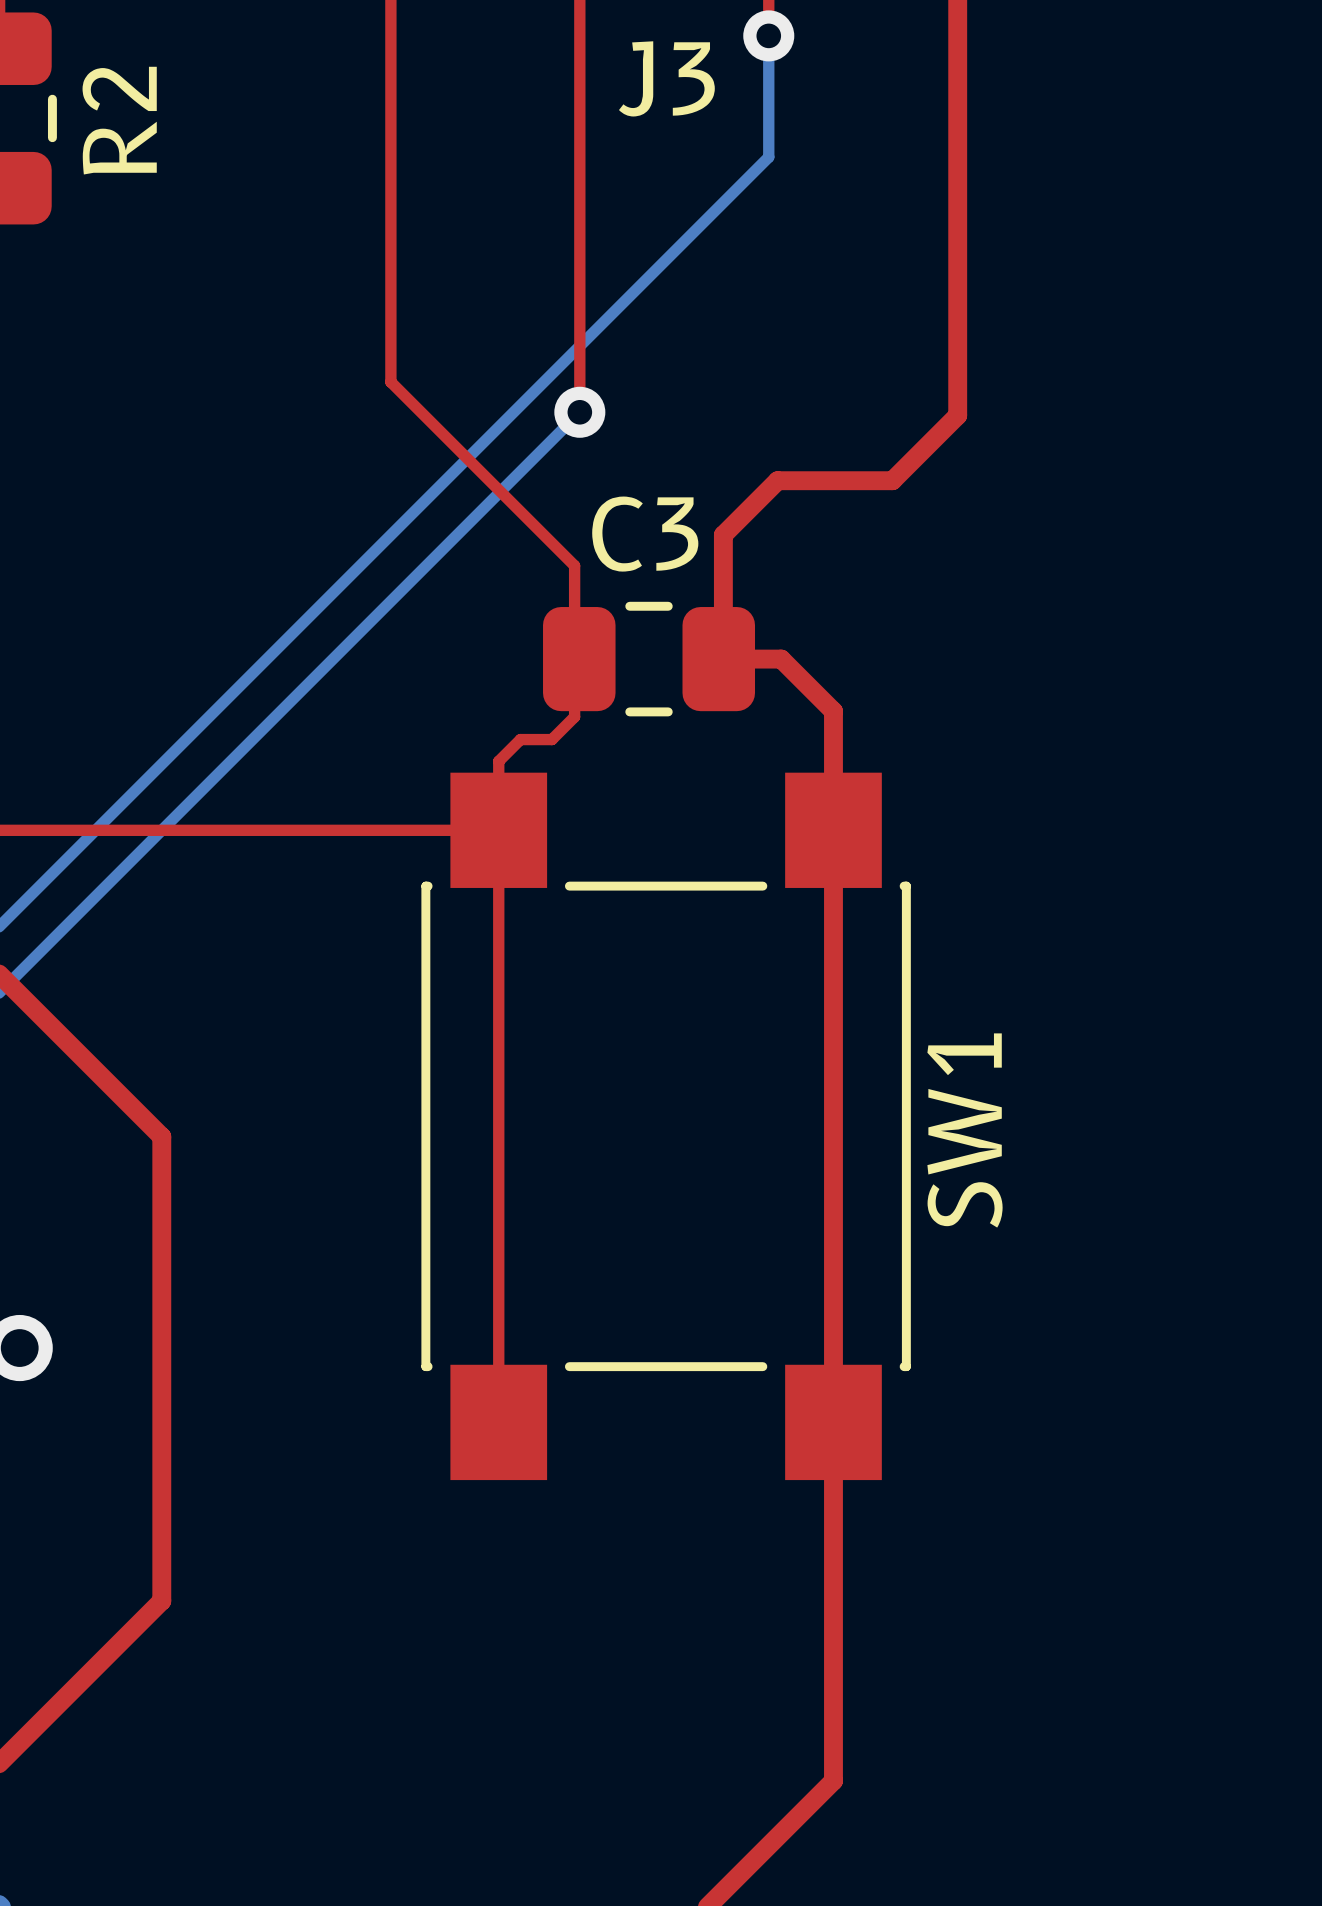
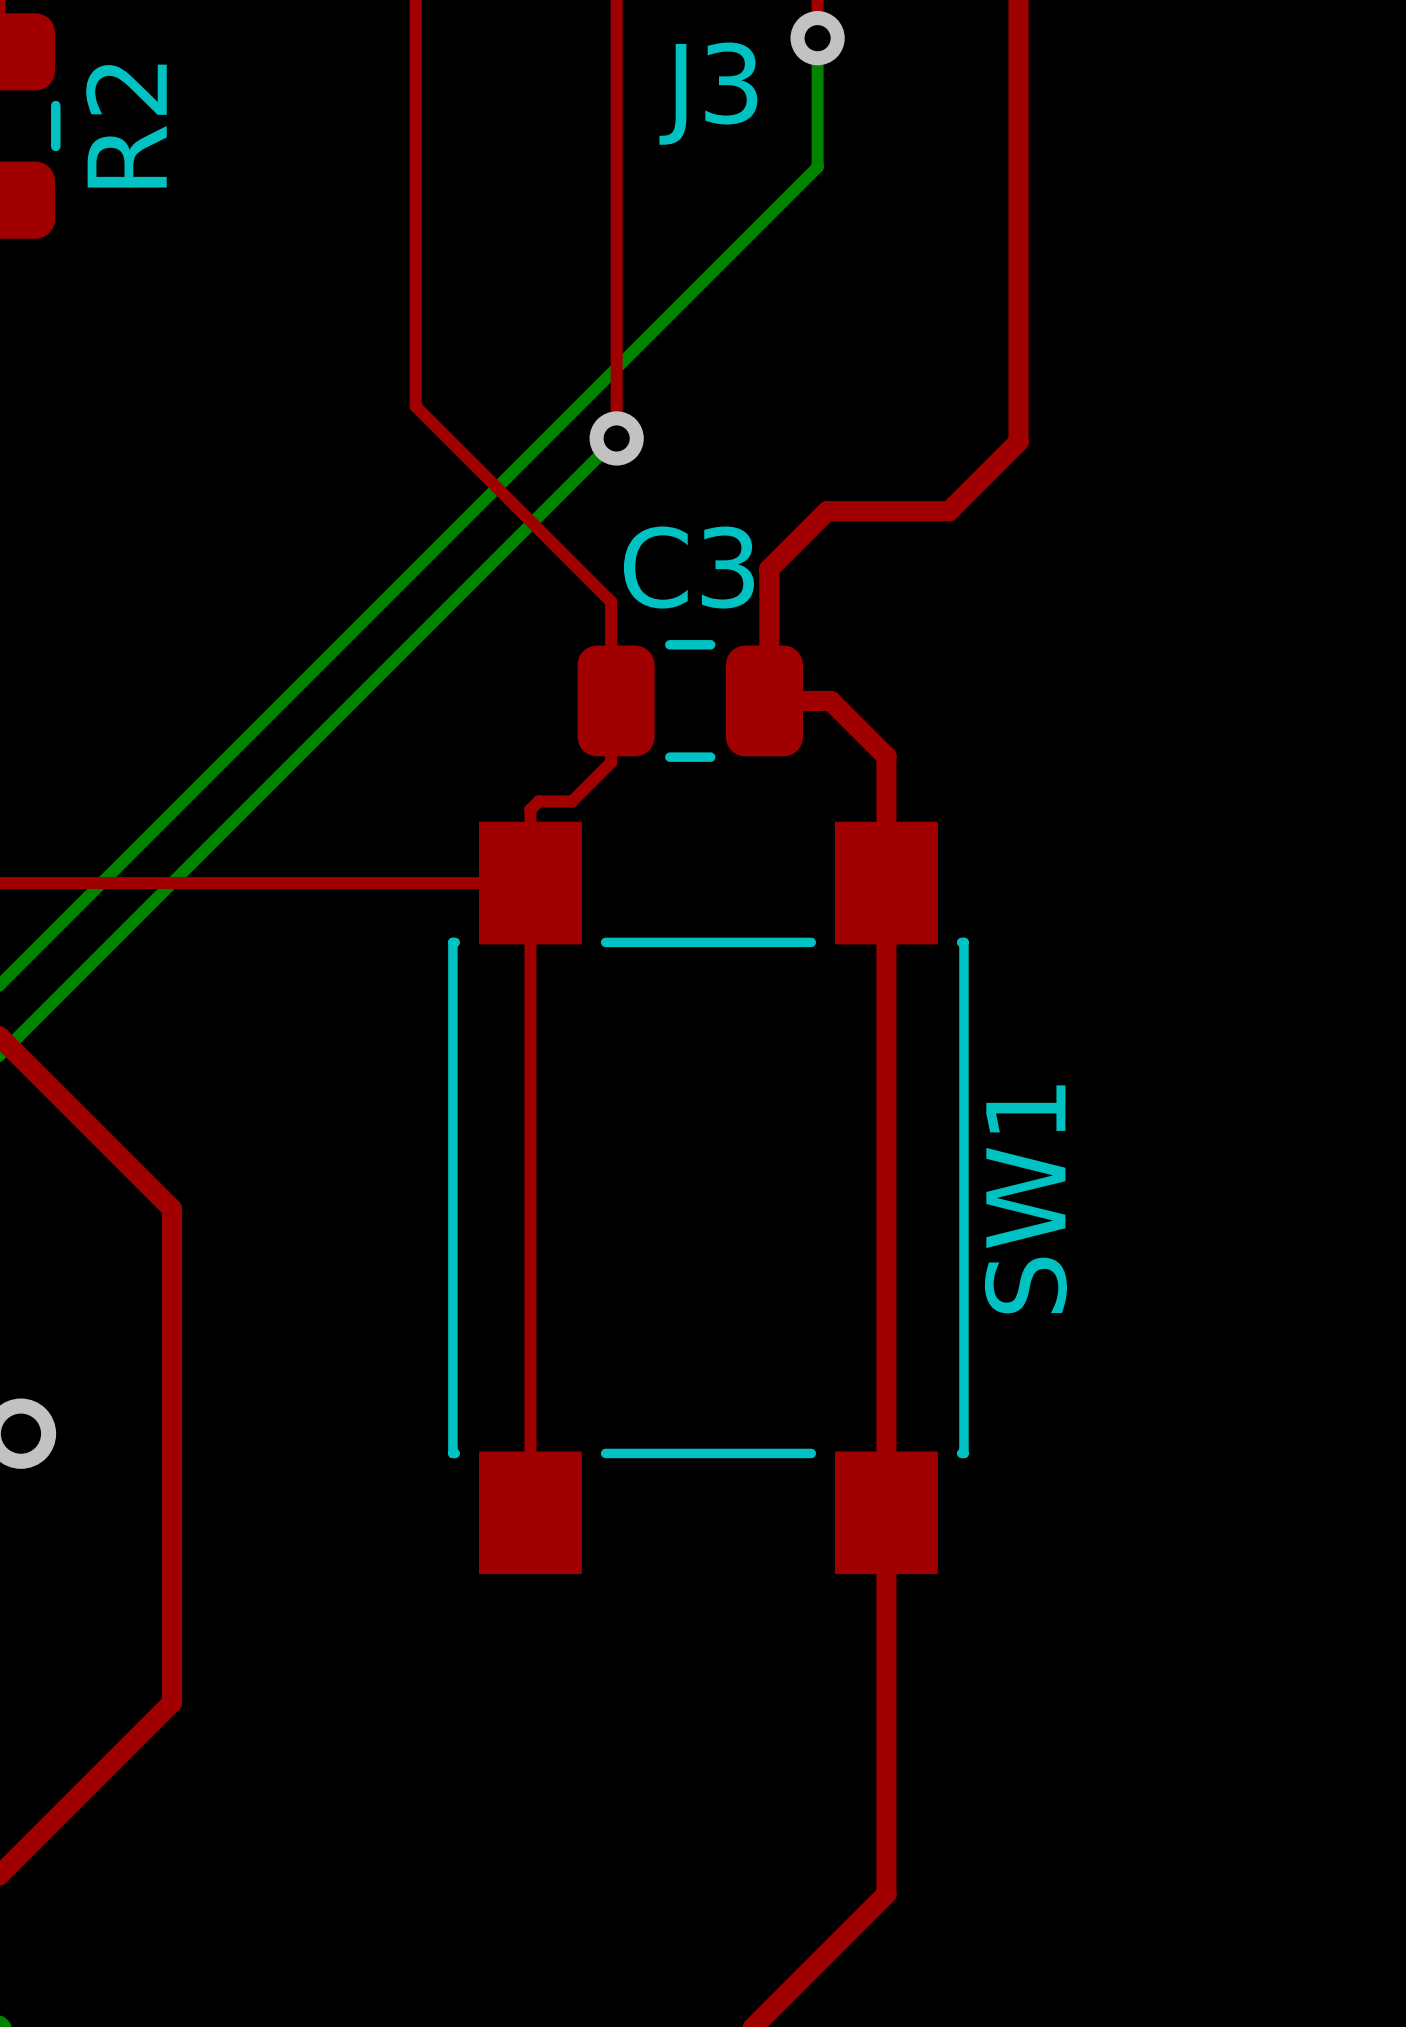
top track: (551, 739) (520, 739) (506, 753) -> (587, 786) (572, 801) (538, 801)

